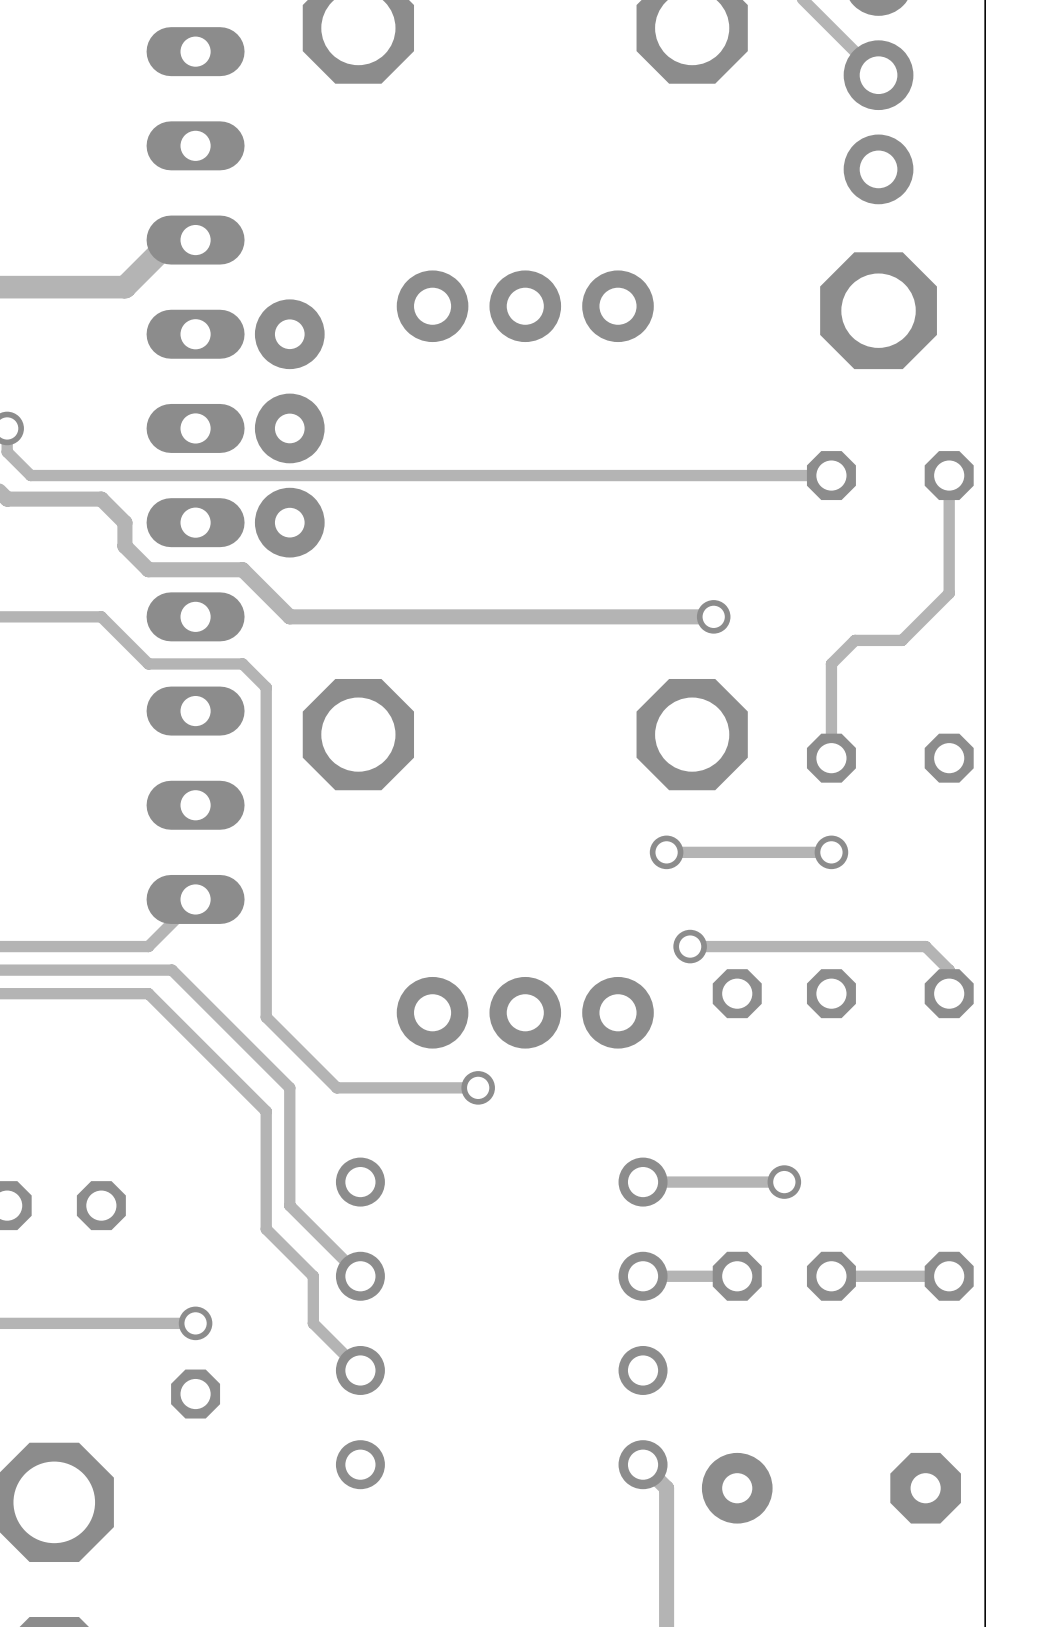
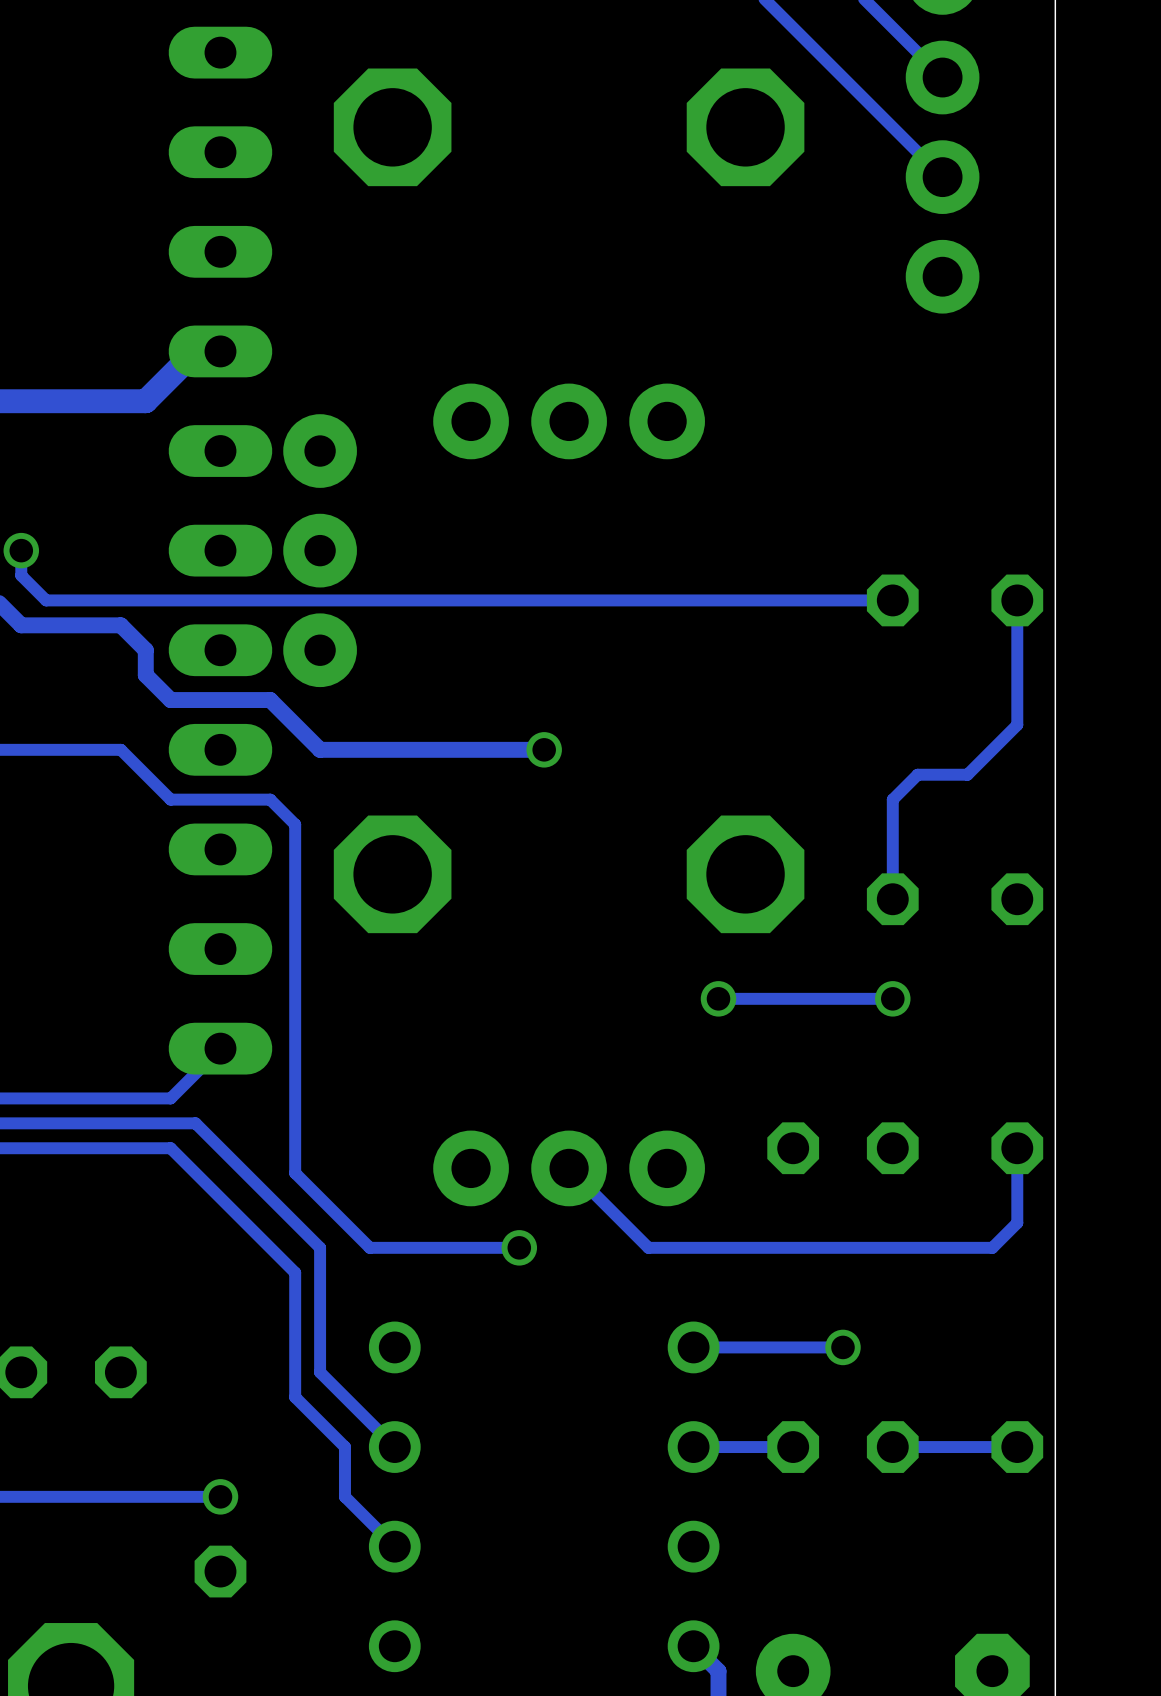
part: (878, 310) -> none
via: none -> (544, 749)
track: (713, 616) (501, 616) -> none
via: (713, 616) -> none
track: (690, 946) (925, 946) (949, 970) (949, 993) -> (569, 1168) (648, 1247) (992, 1247) (1017, 1222) (1017, 1148)
via: (690, 946) -> none

